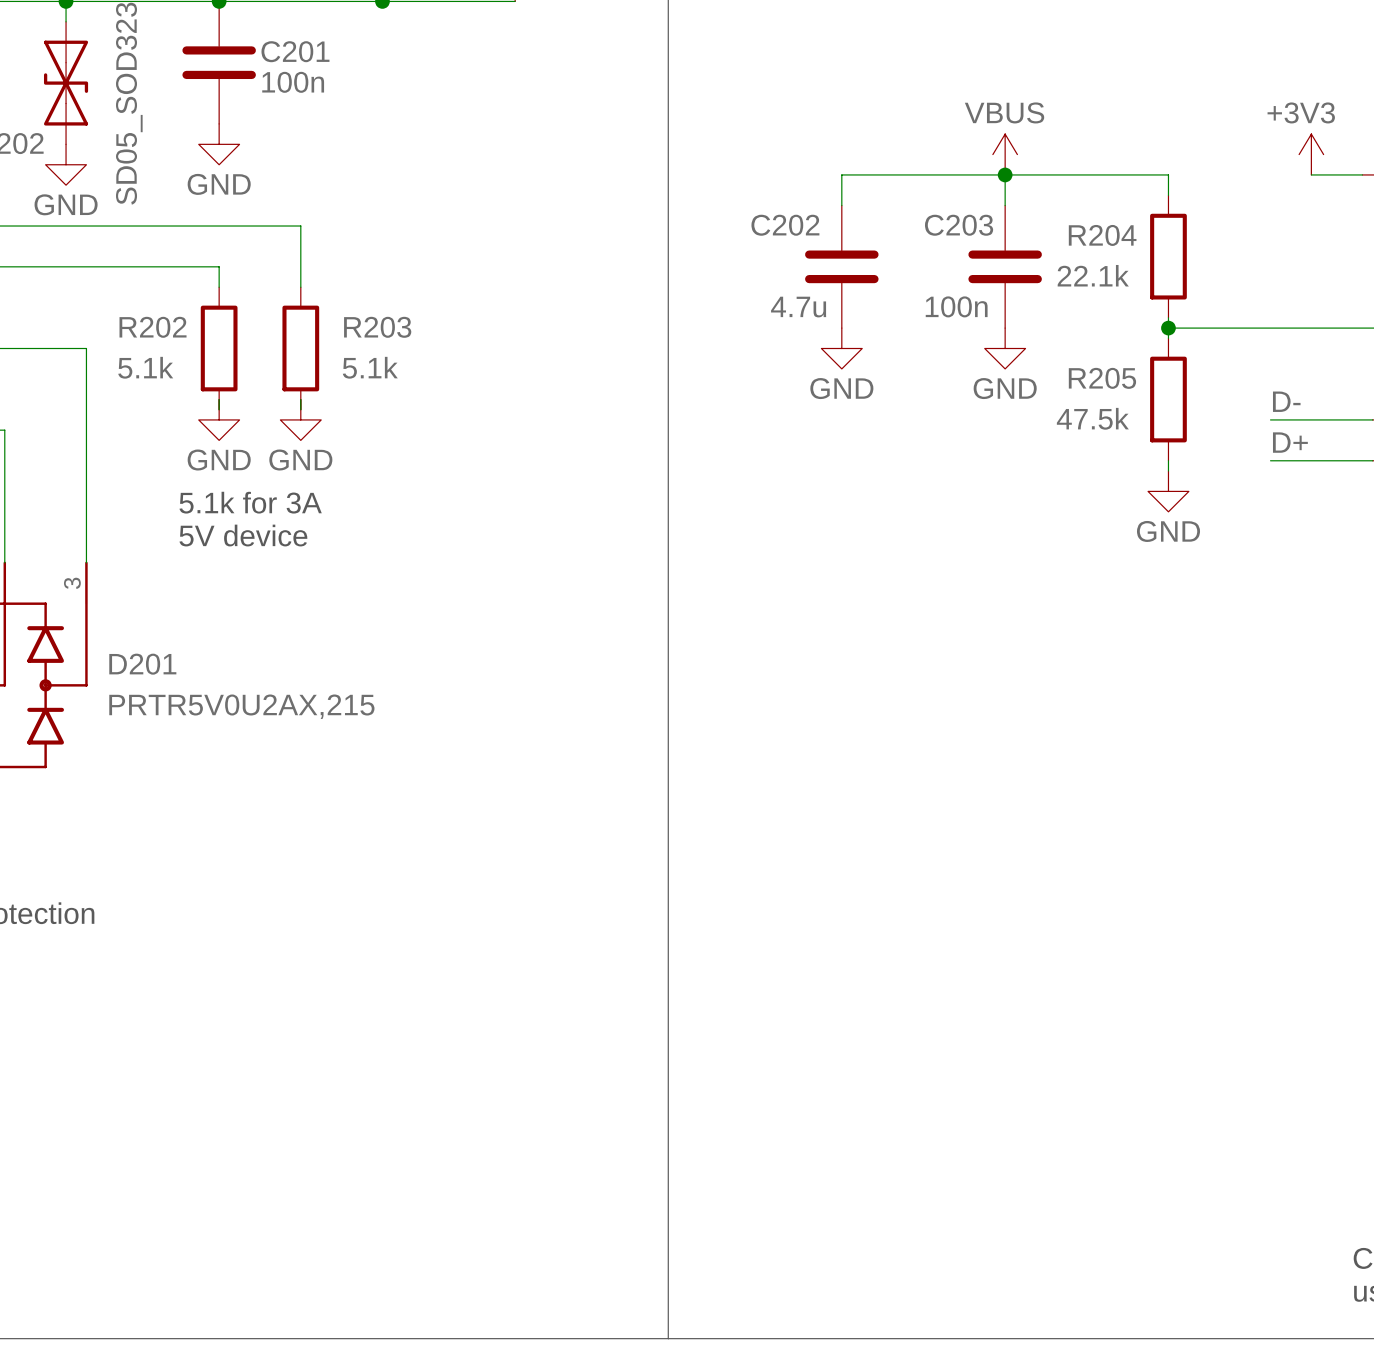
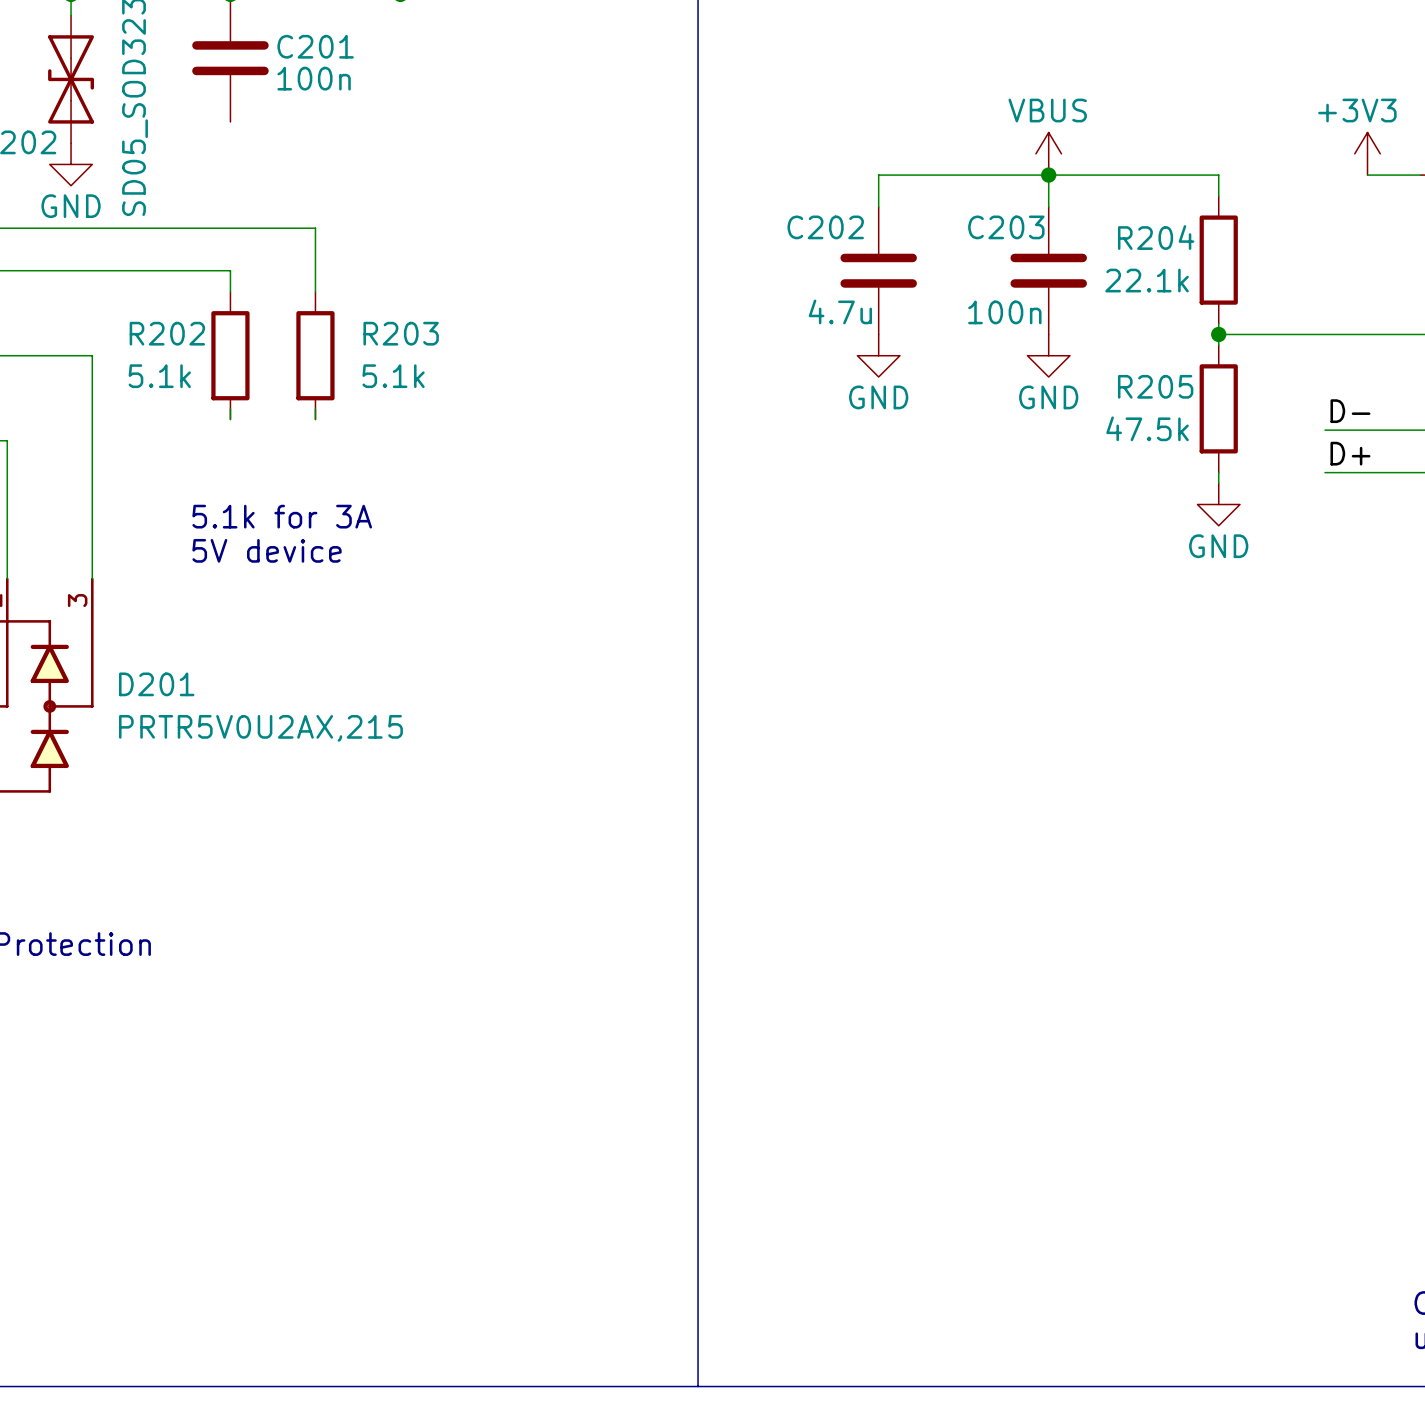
power symbol: GND (219, 144) -> none
power symbol: GND (219, 419) -> none
power symbol: GND (300, 419) -> none

